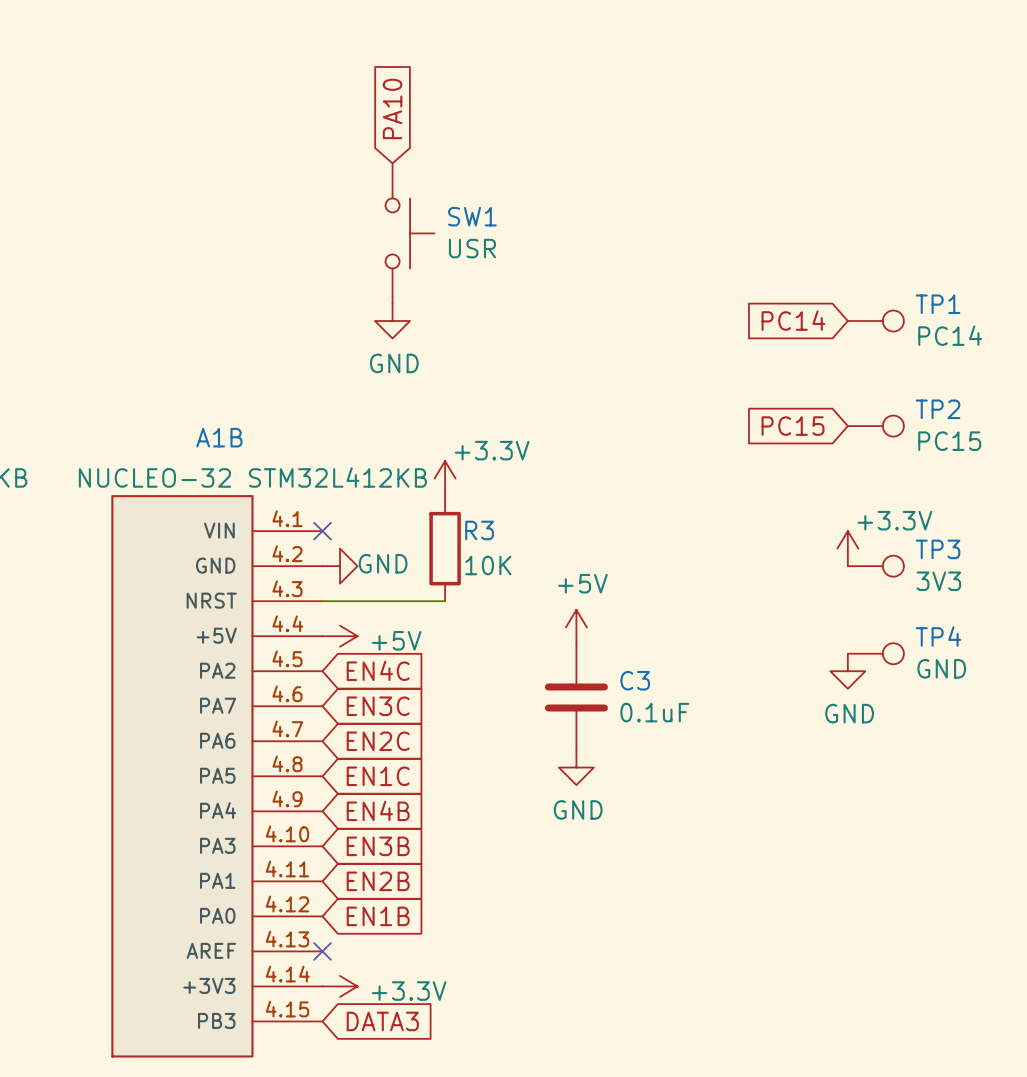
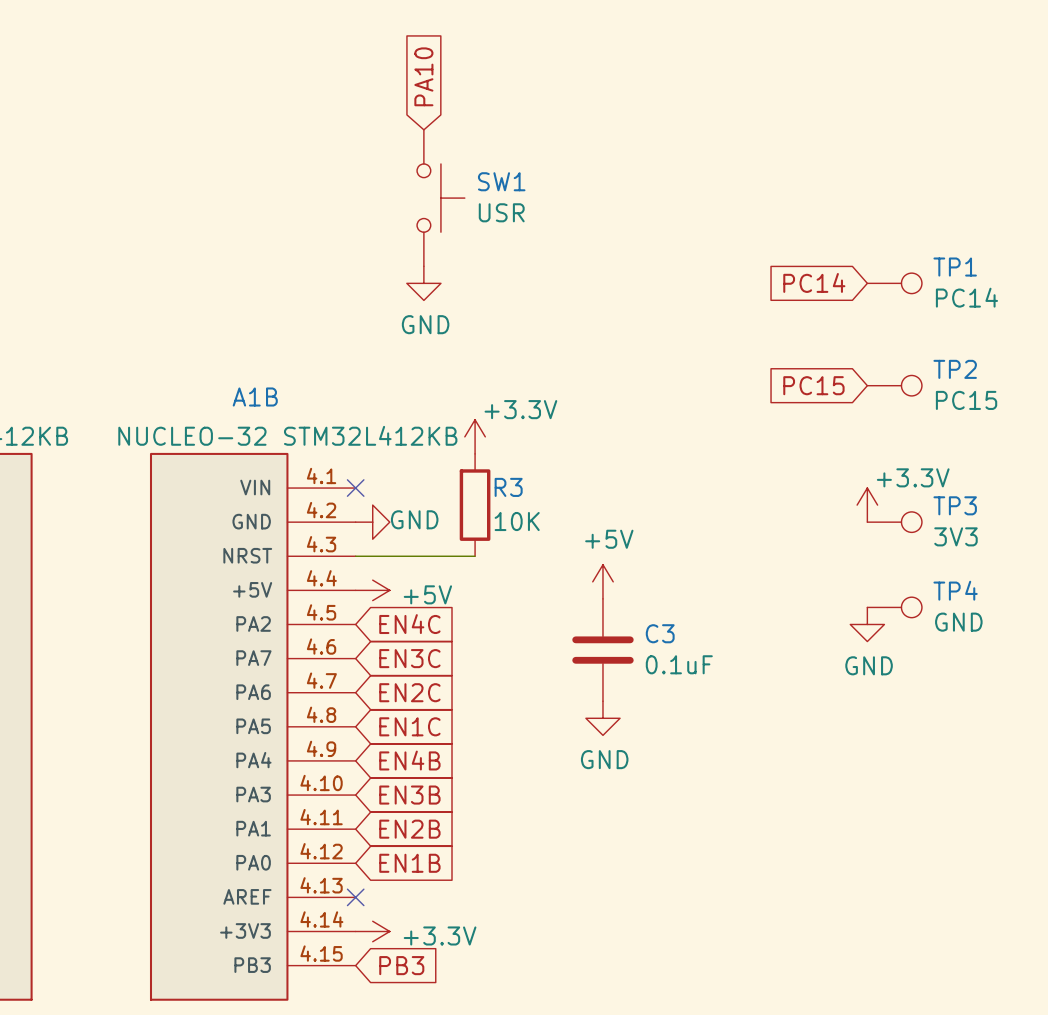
global label: DATA3 (382, 1021) -> PB3 (401, 965)

